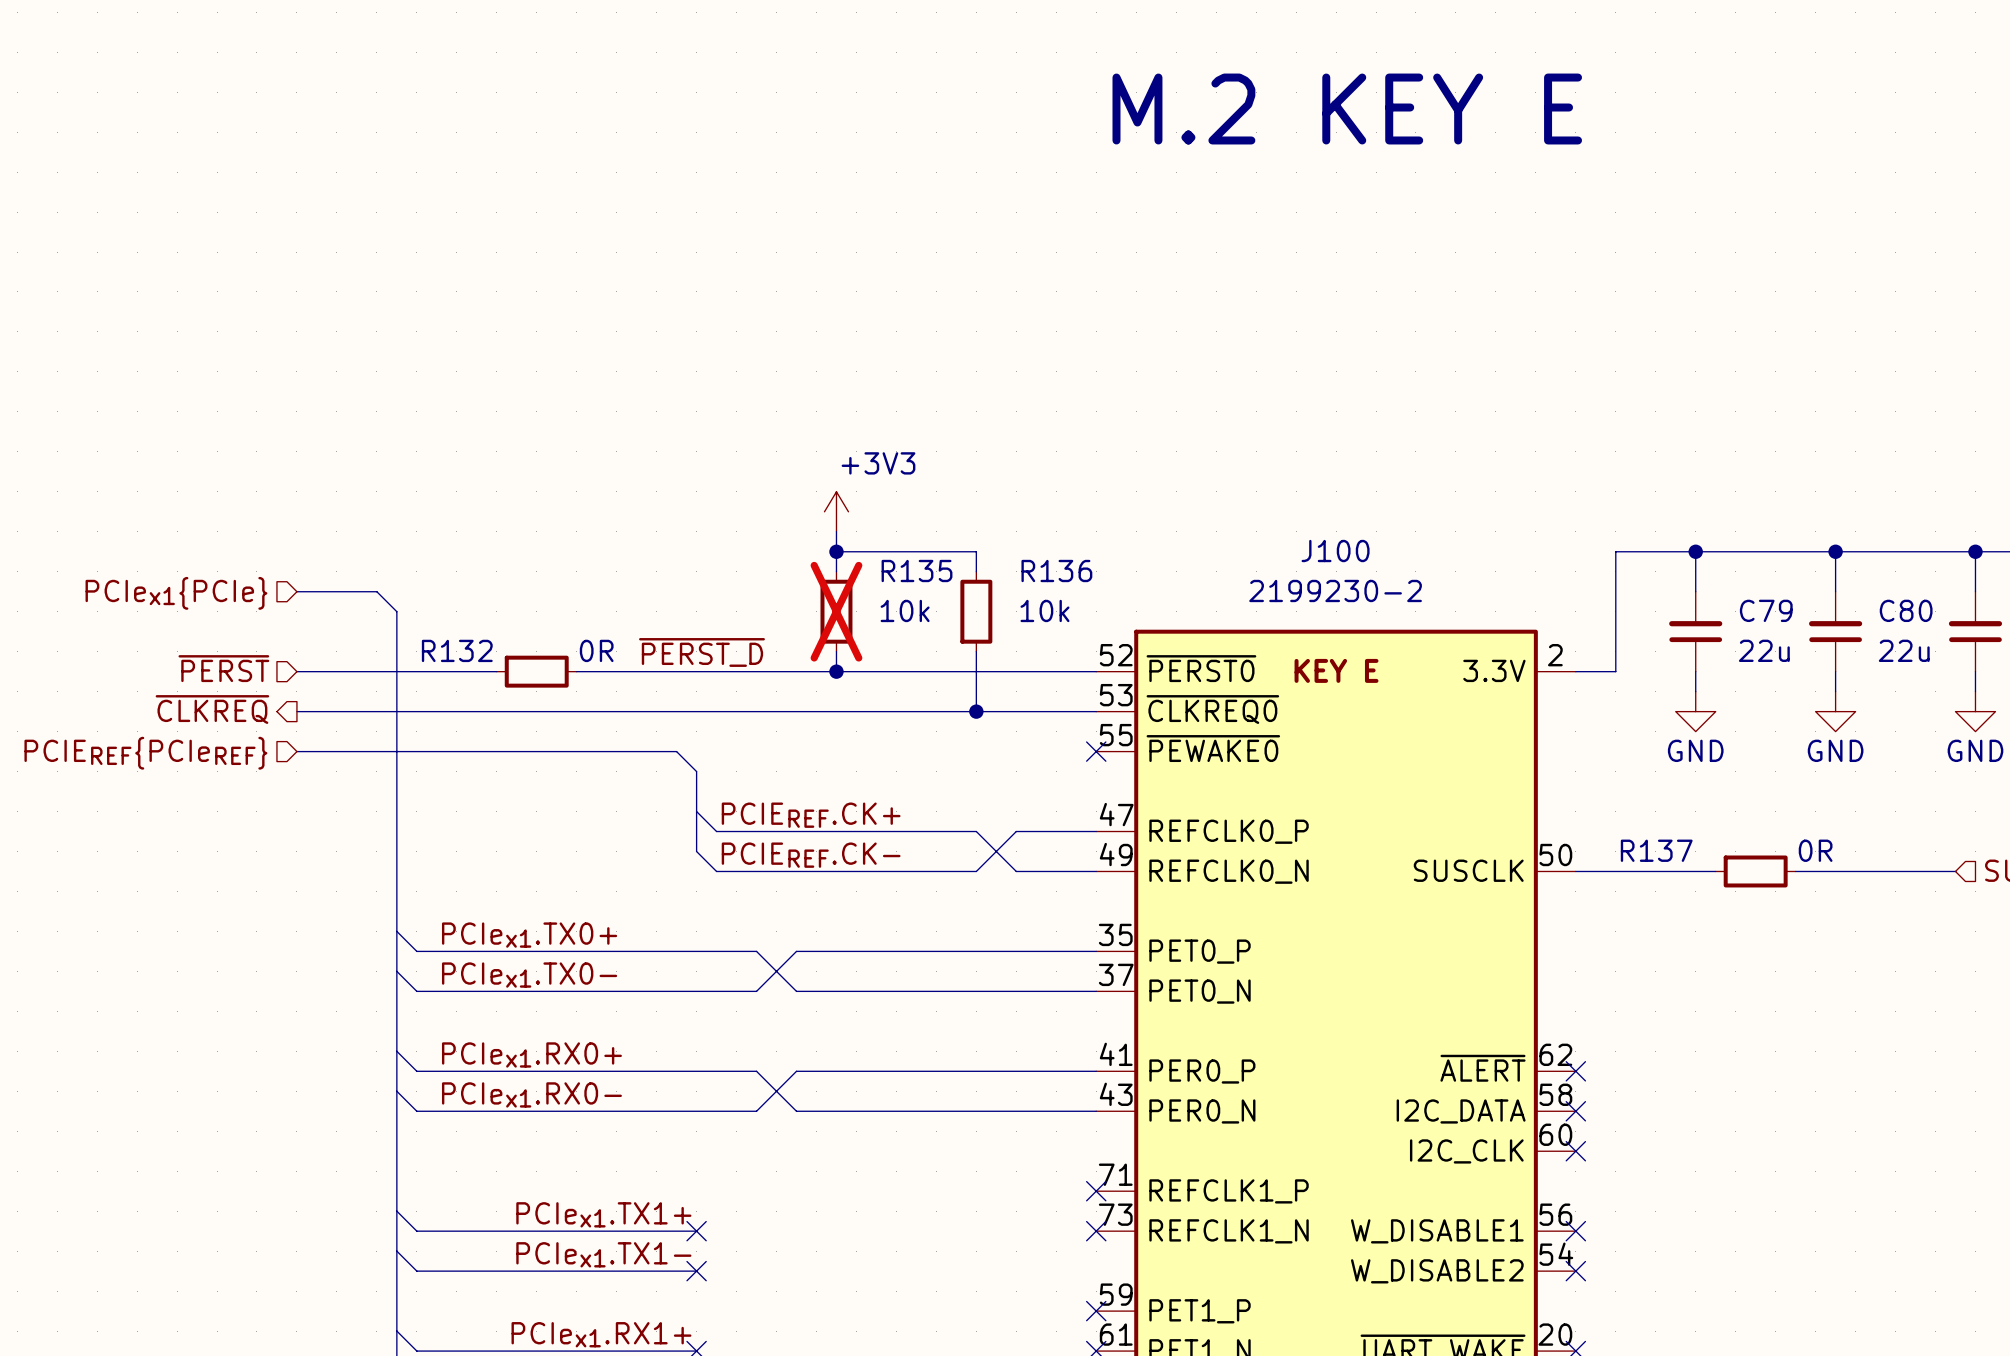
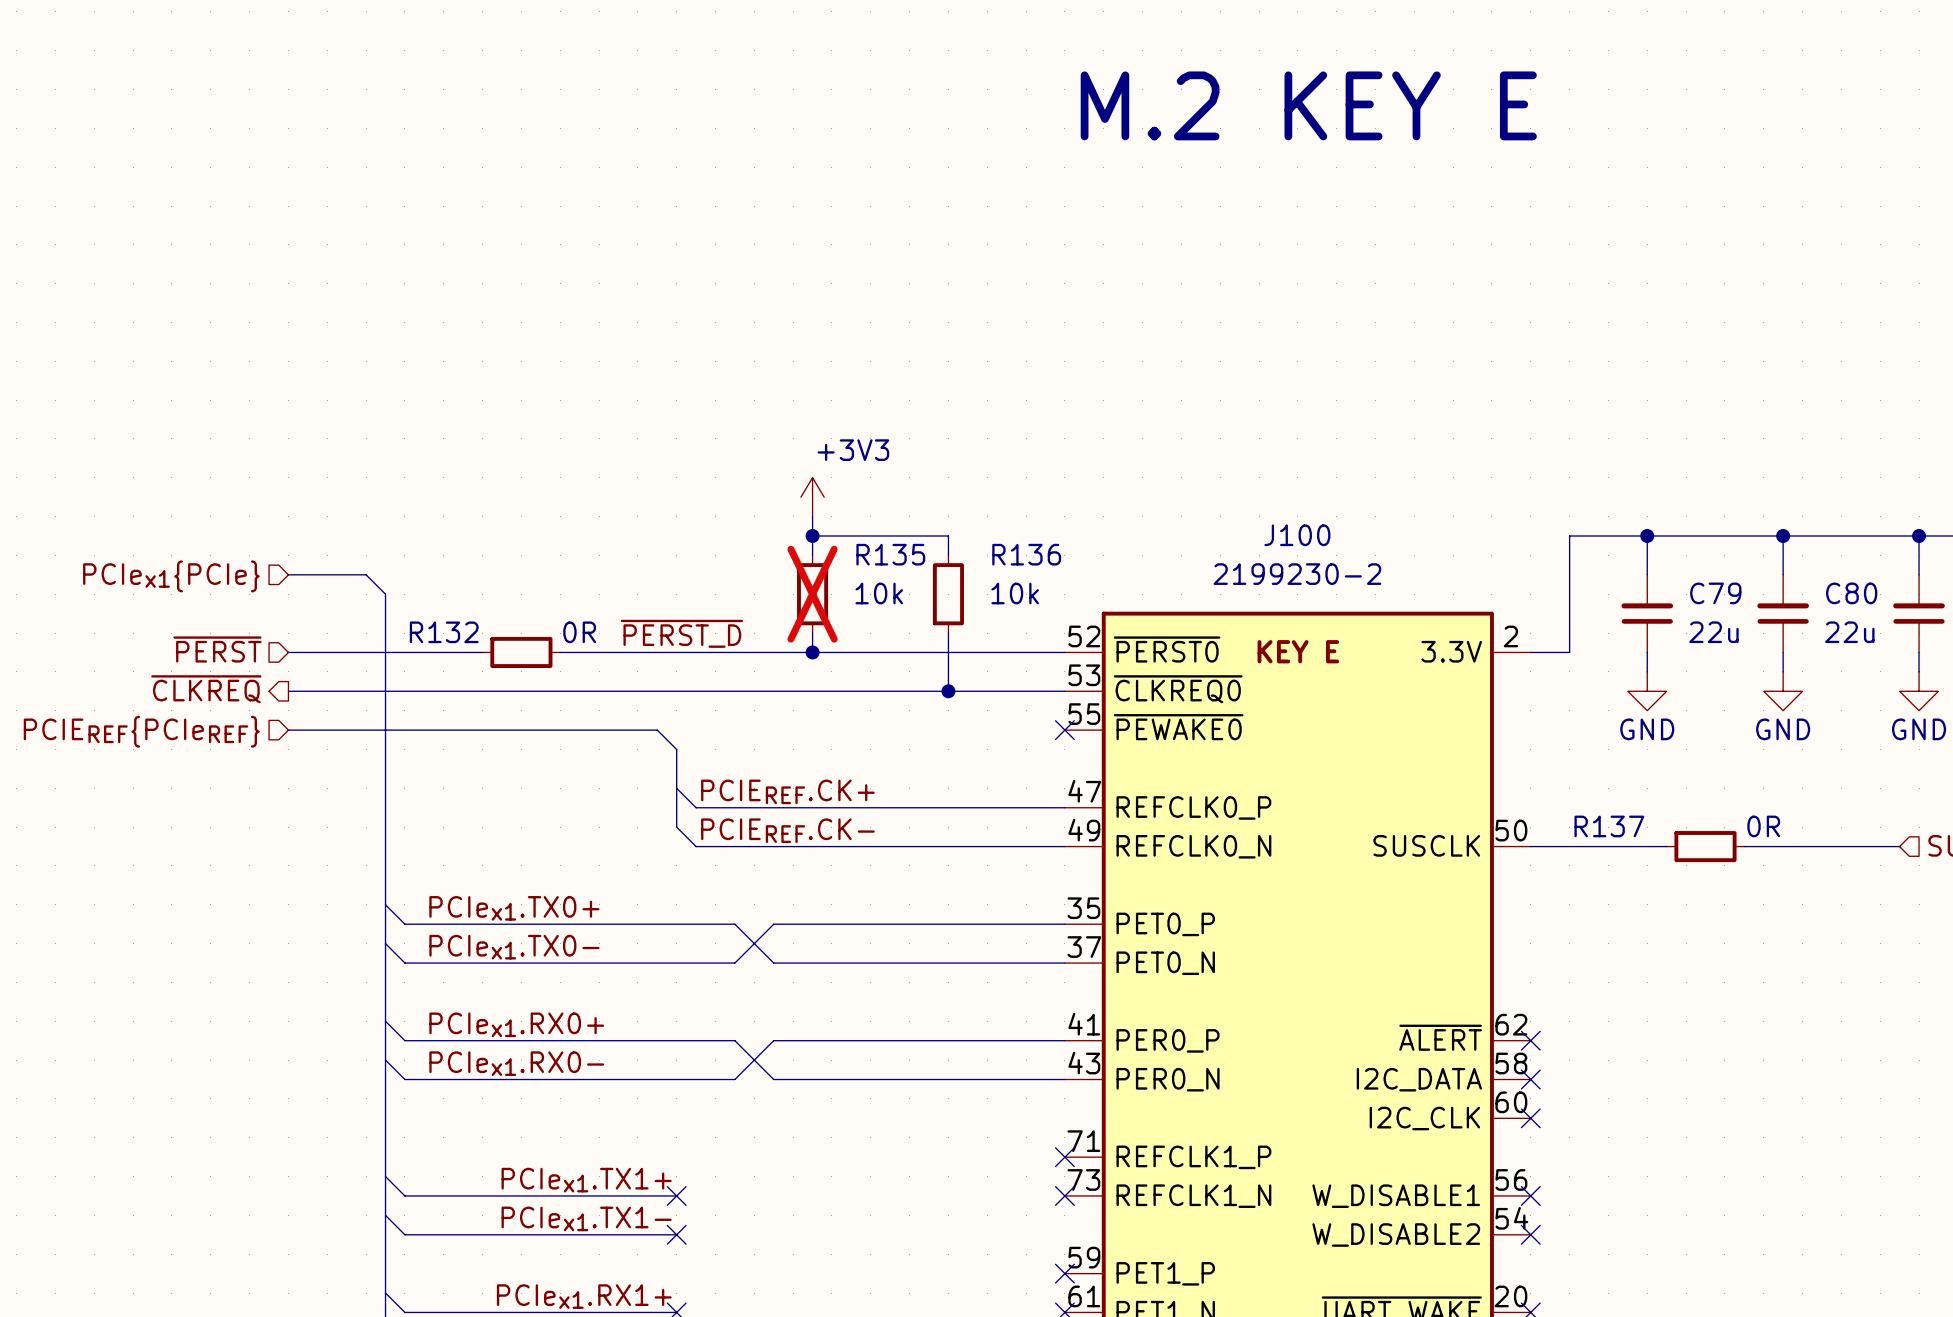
wire: (976, 831) (1016, 871) -> (948, 807) (987, 807)
wire: (1016, 831) (976, 871) -> (987, 846) (948, 846)

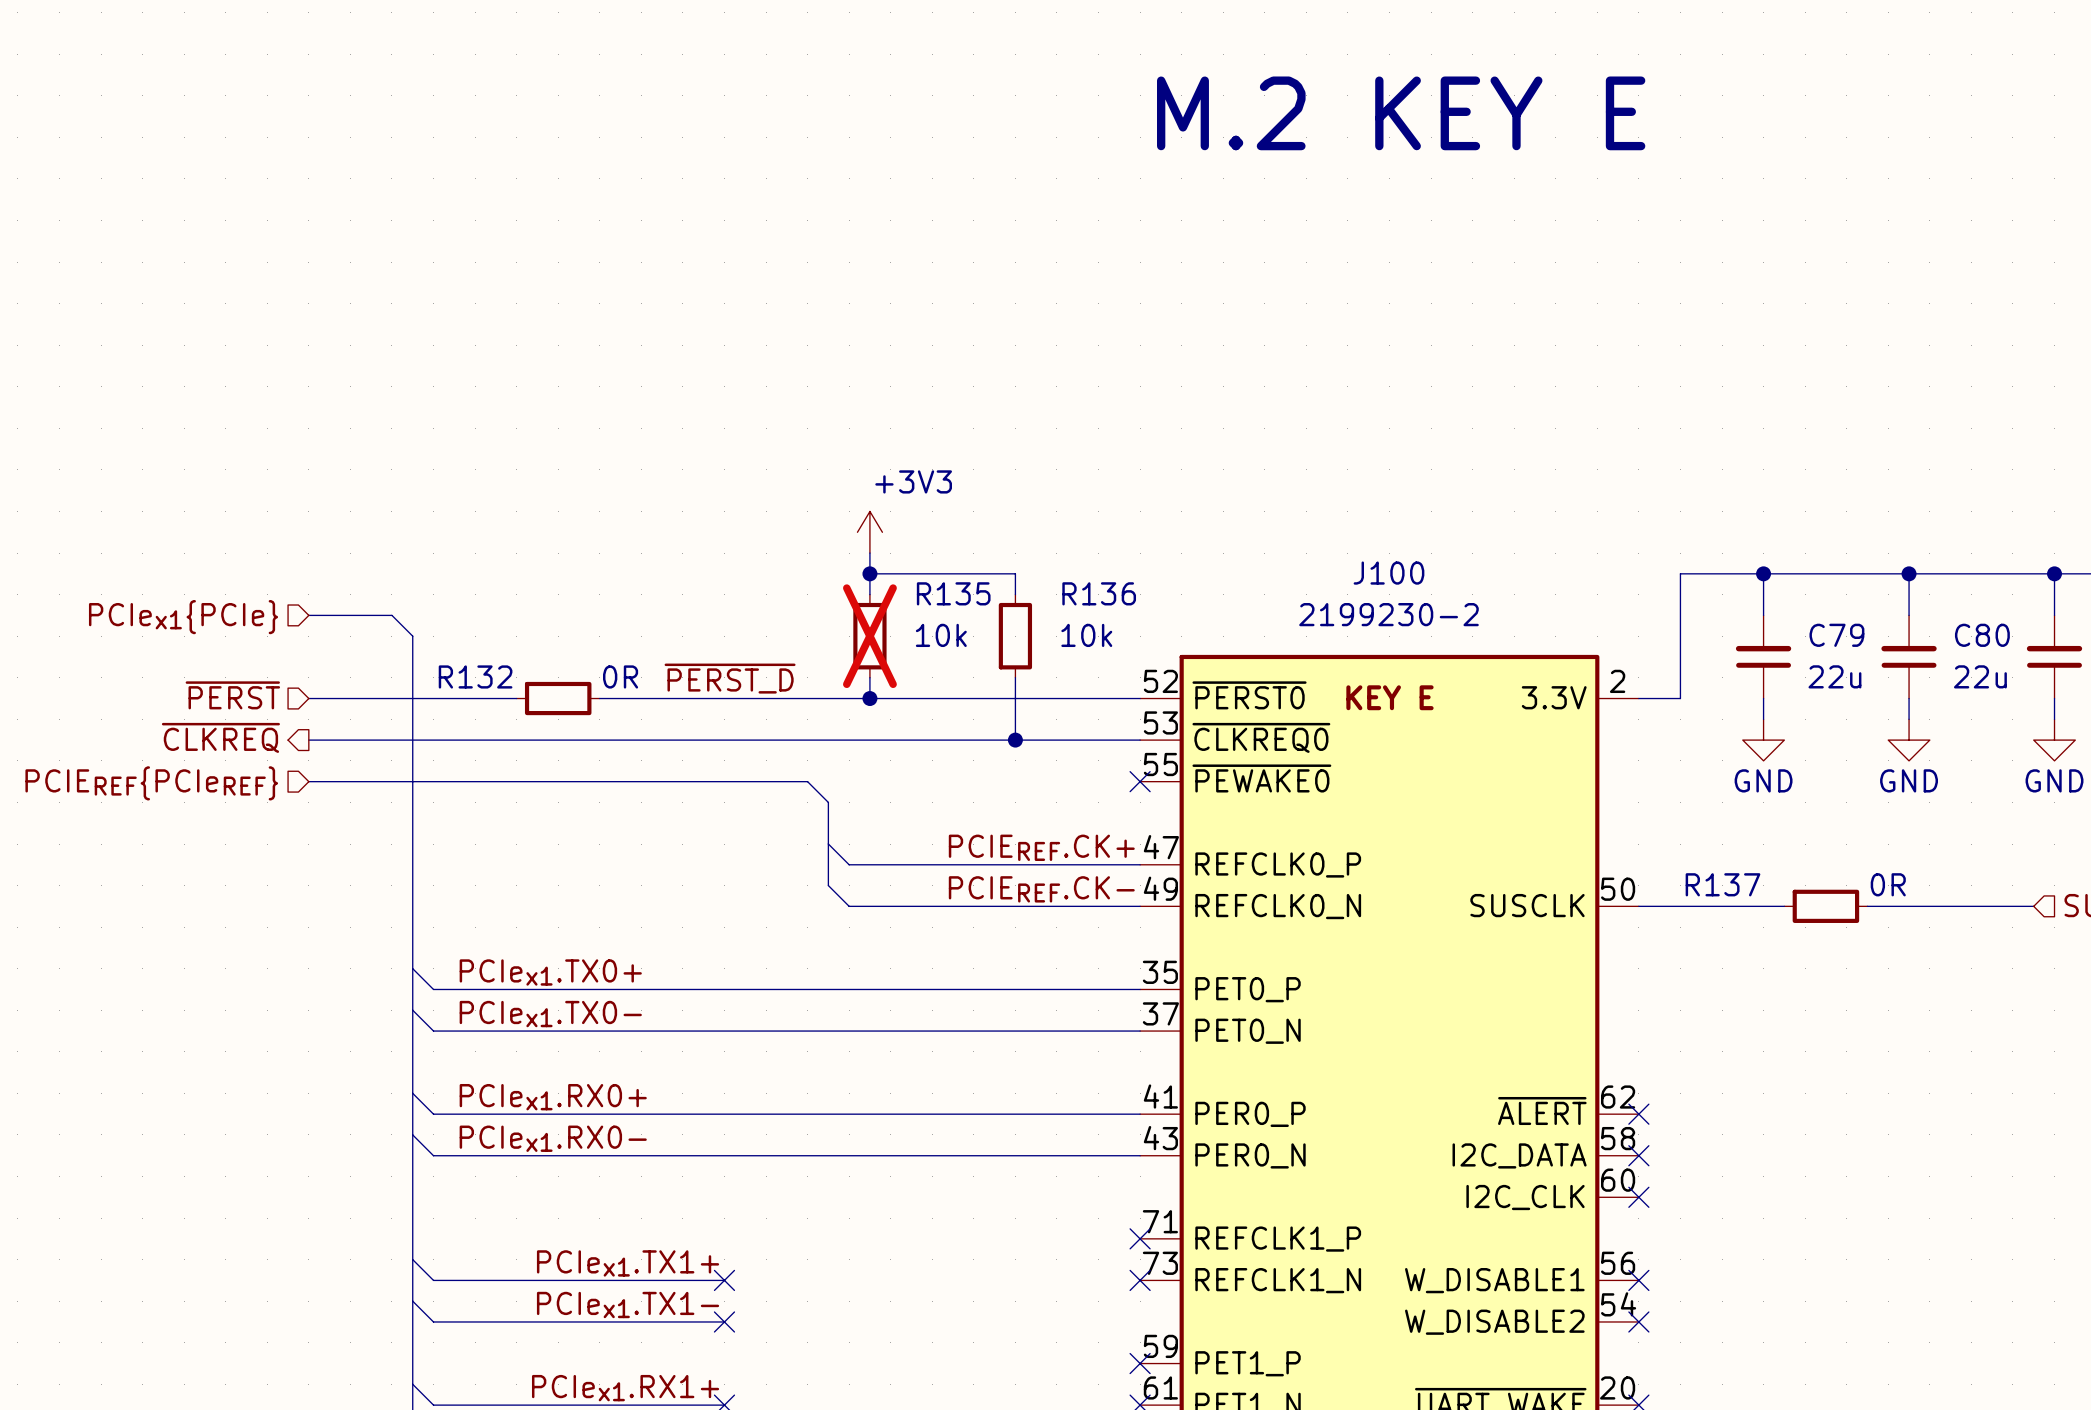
bus: (657, 730) (676, 749) (676, 827) -> (703, 781) (807, 781) (828, 802) (828, 885)
wire: (676, 788) (696, 807) (793, 807) -> (828, 844) (849, 864)
label position: PCIEREF.CK+ (787, 791) -> PCIEREF.CK+ (1041, 847)
wire: (676, 827) (696, 846) (793, 846) -> (828, 885) (849, 906)
label position: PCIEREF.CK- (787, 830) -> PCIEREF.CK- (1041, 889)
wire: (734, 924) (773, 963) -> (786, 989) (828, 989)
wire: (773, 924) (734, 963) -> (828, 1031) (786, 1031)
wire: (734, 1040) (773, 1079) -> (786, 1114) (828, 1114)
wire: (773, 1040) (734, 1079) -> (828, 1155) (786, 1155)

